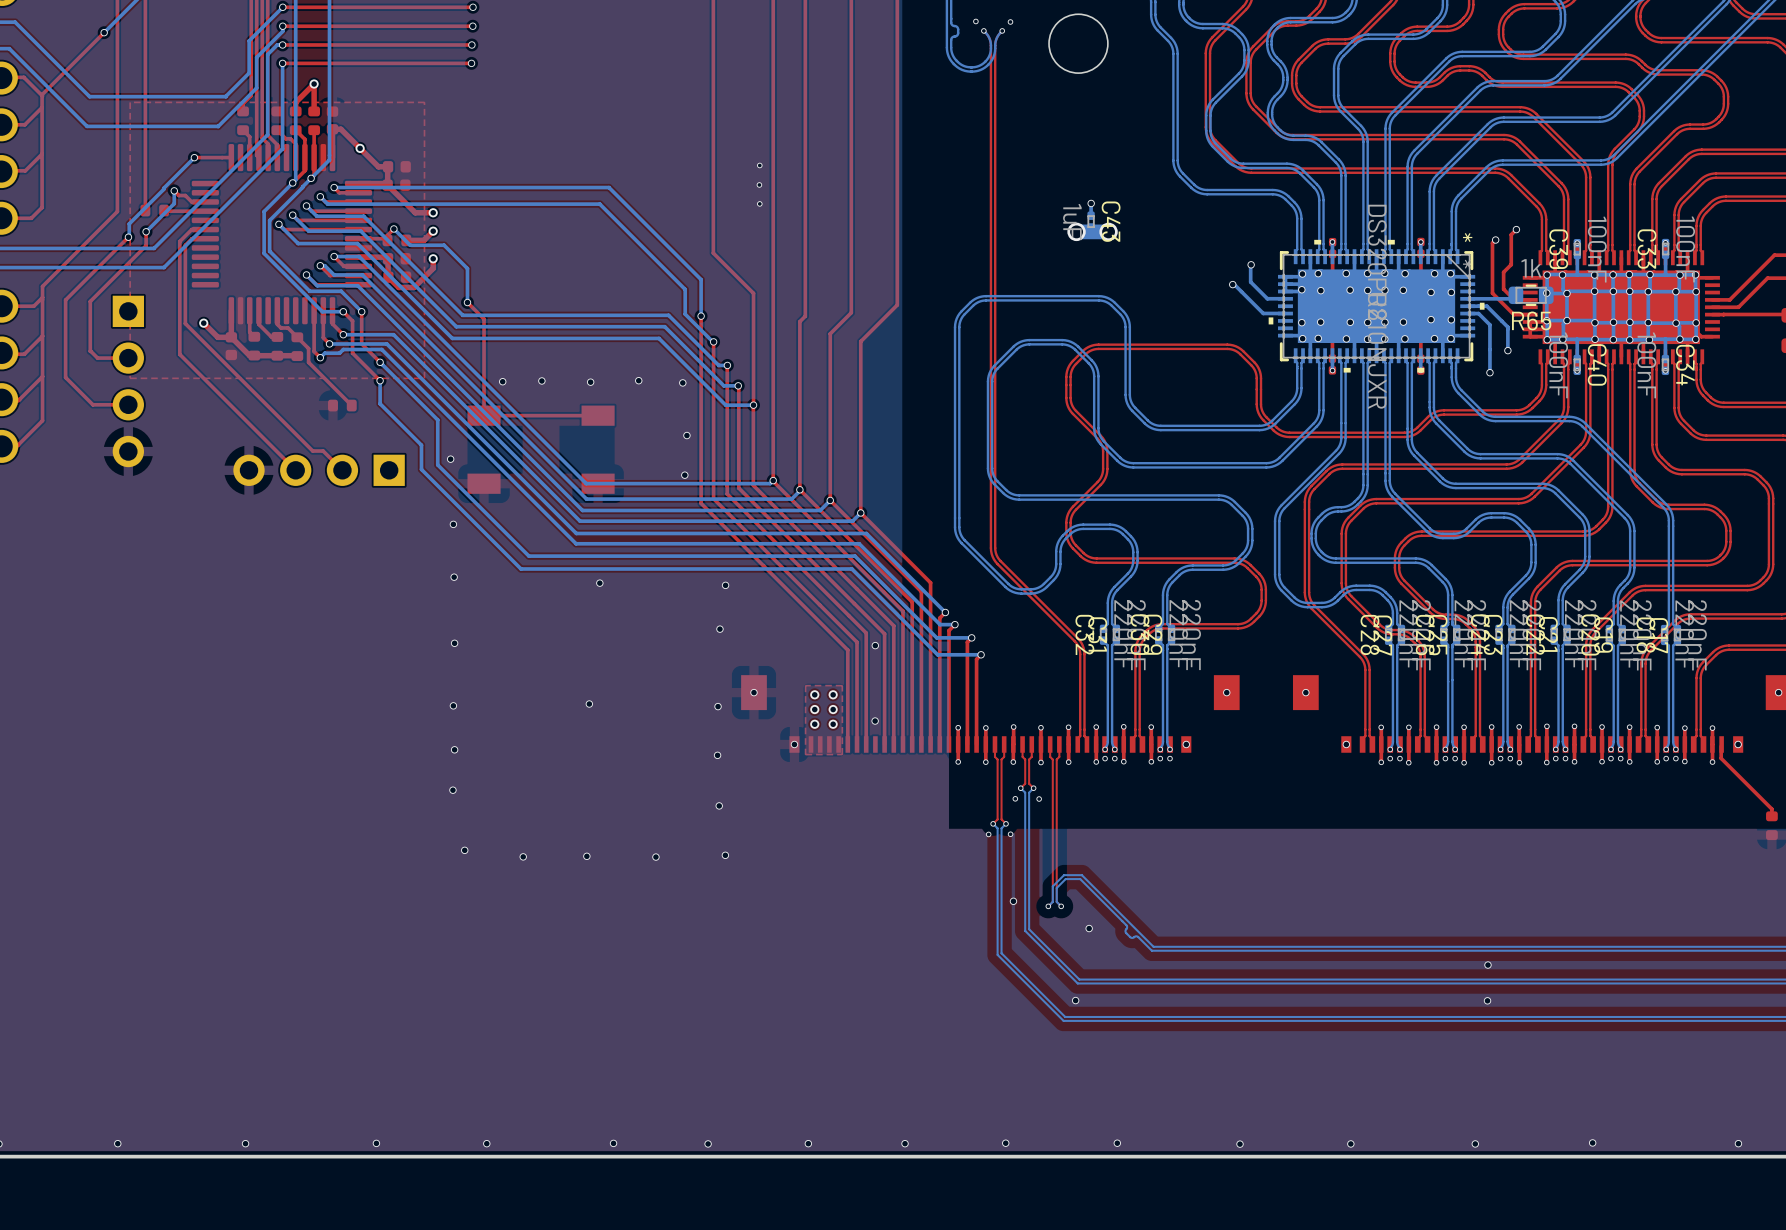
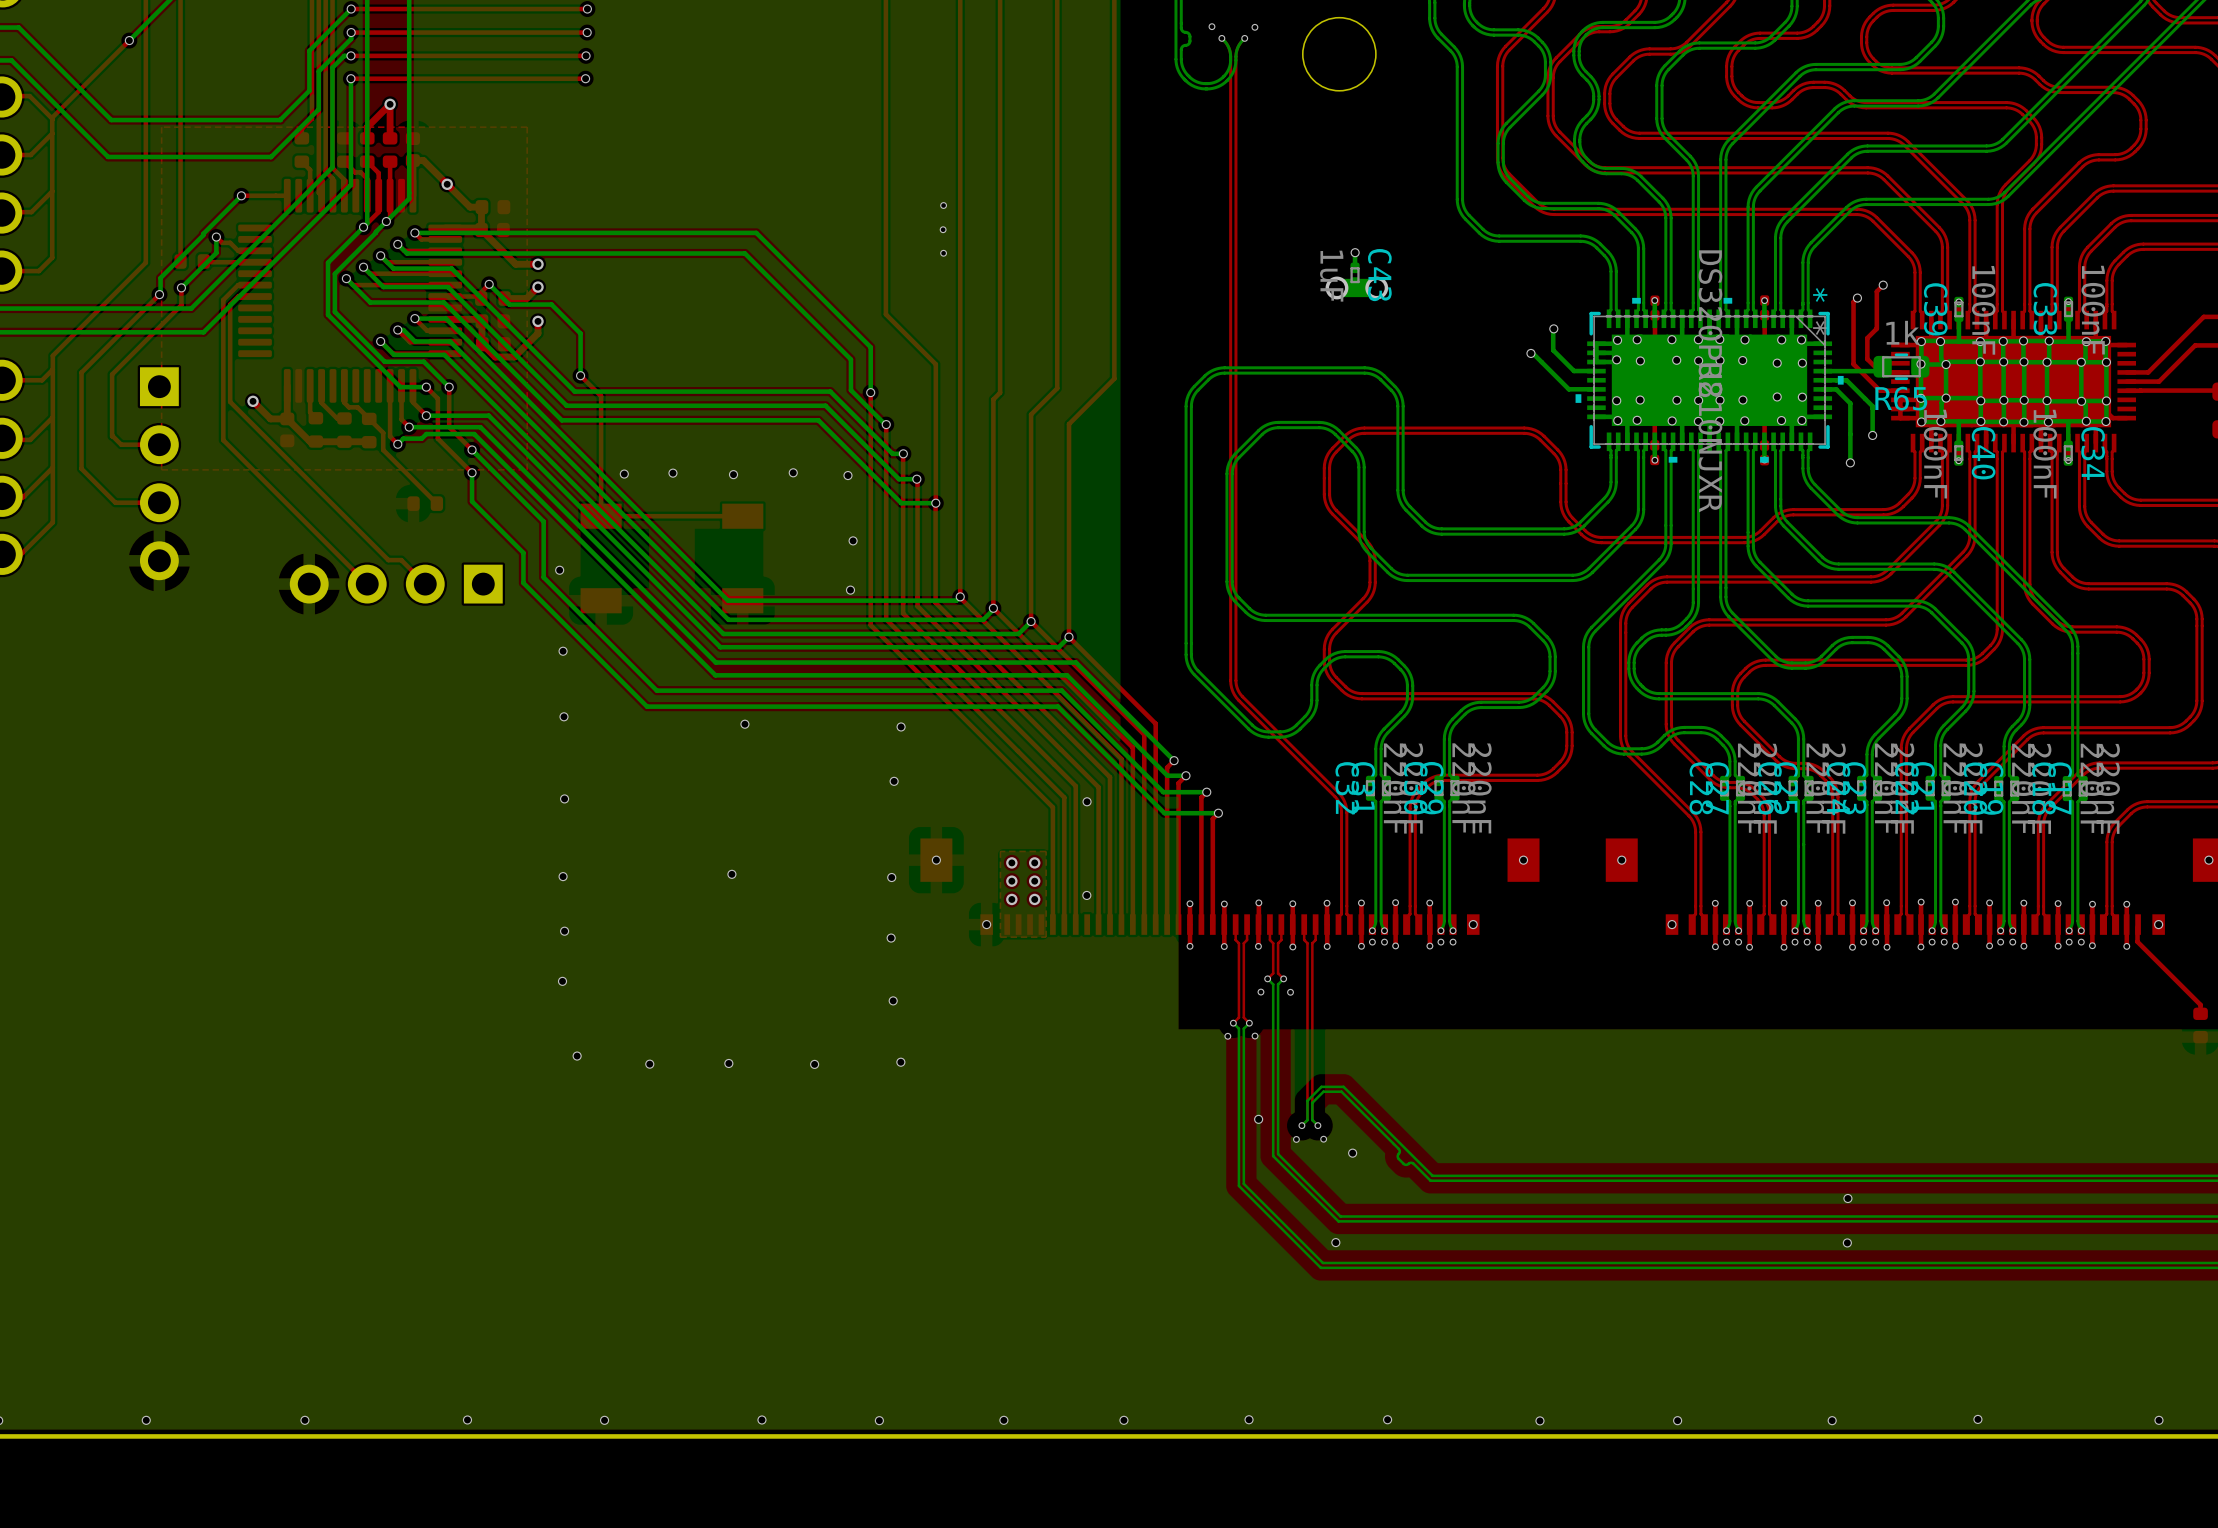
via: none -> (1296, 1139)
via: none -> (1323, 1139)

